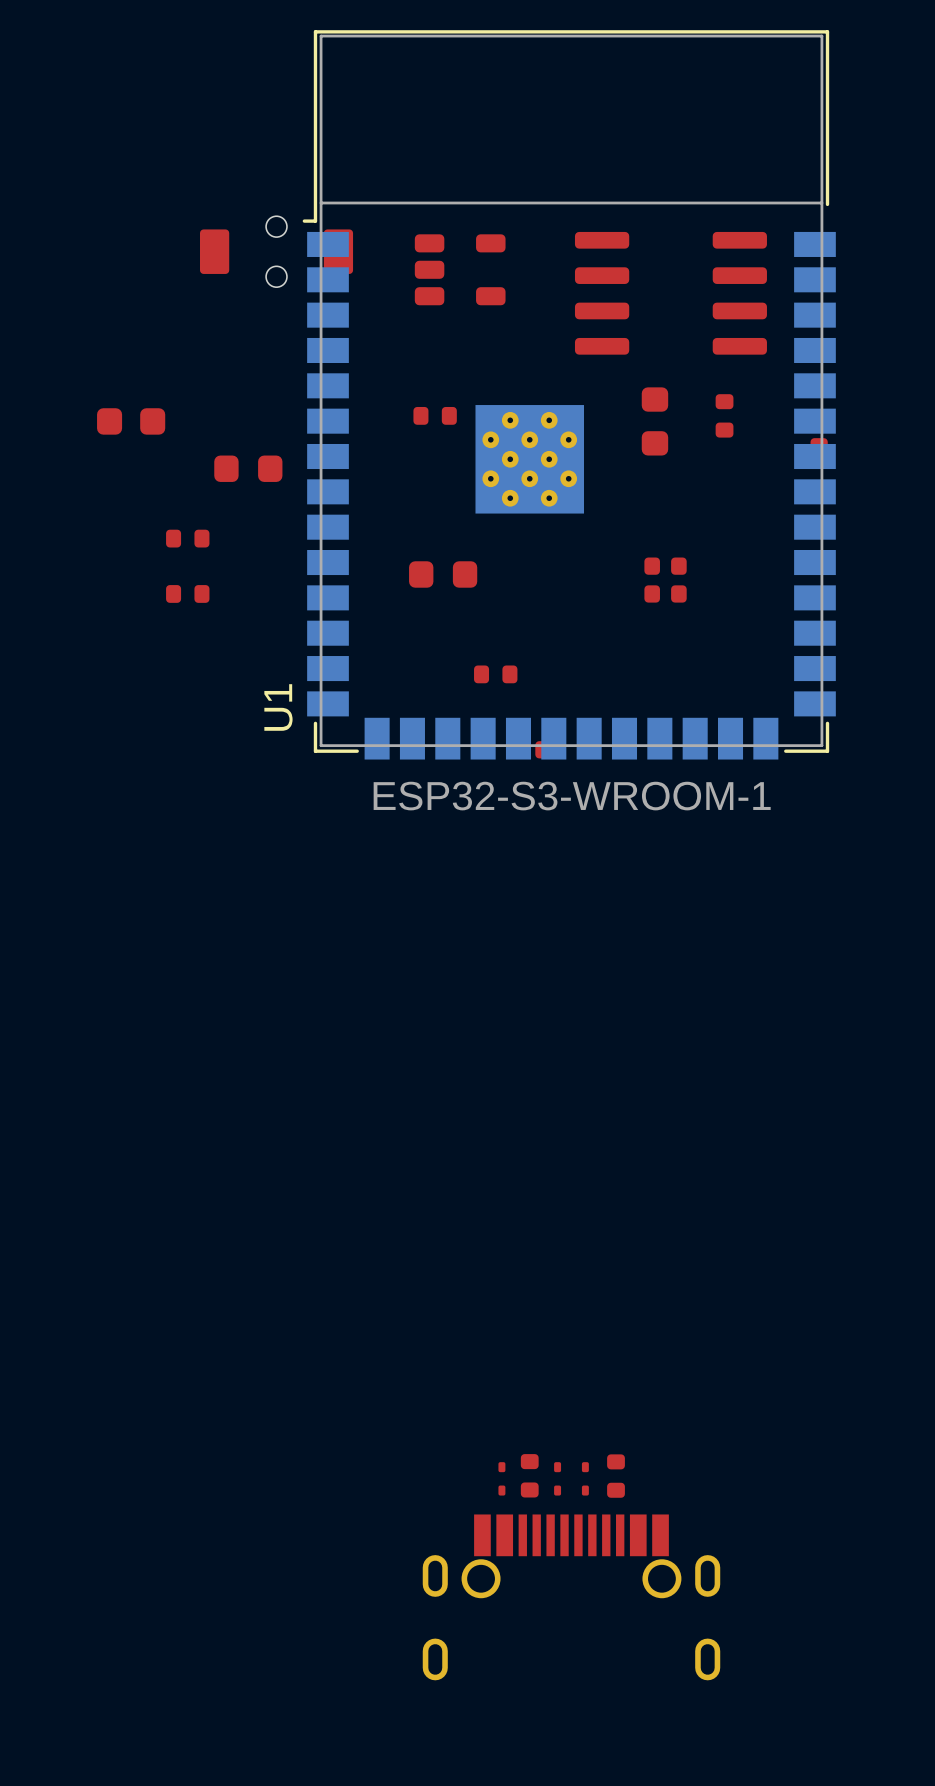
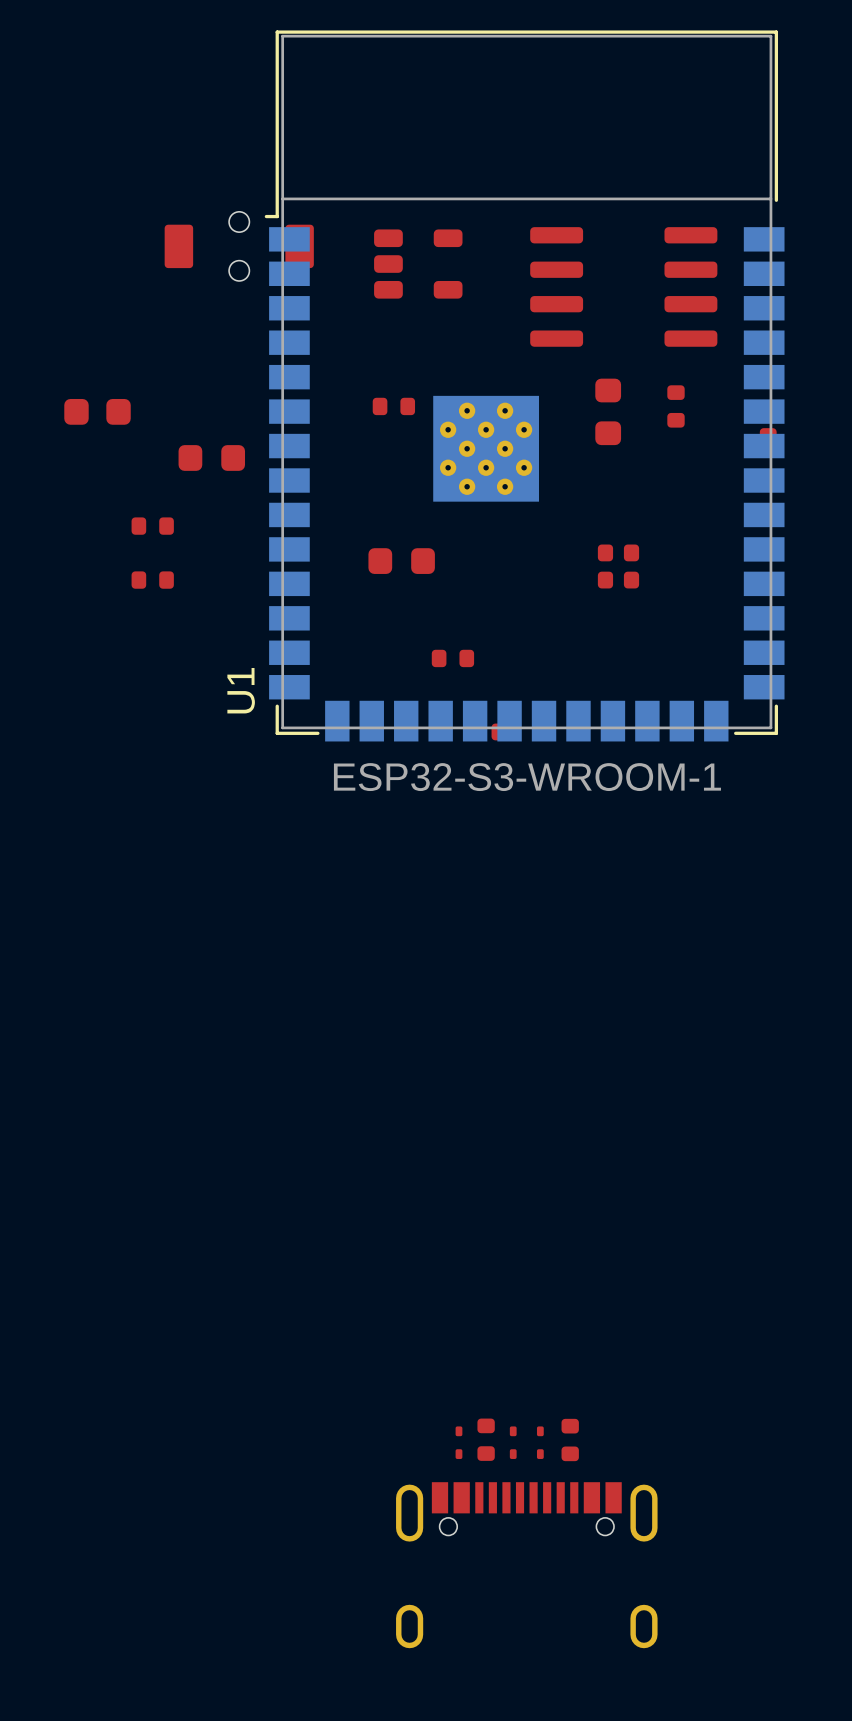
part footprint: [422, 1514, 721, 1681] -> [396, 1482, 658, 1649]

